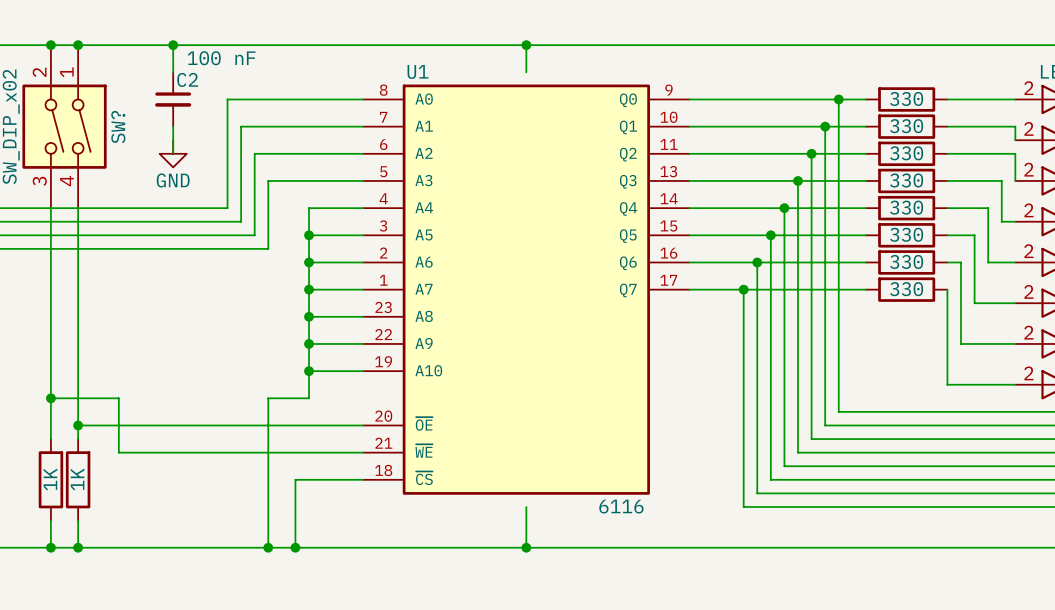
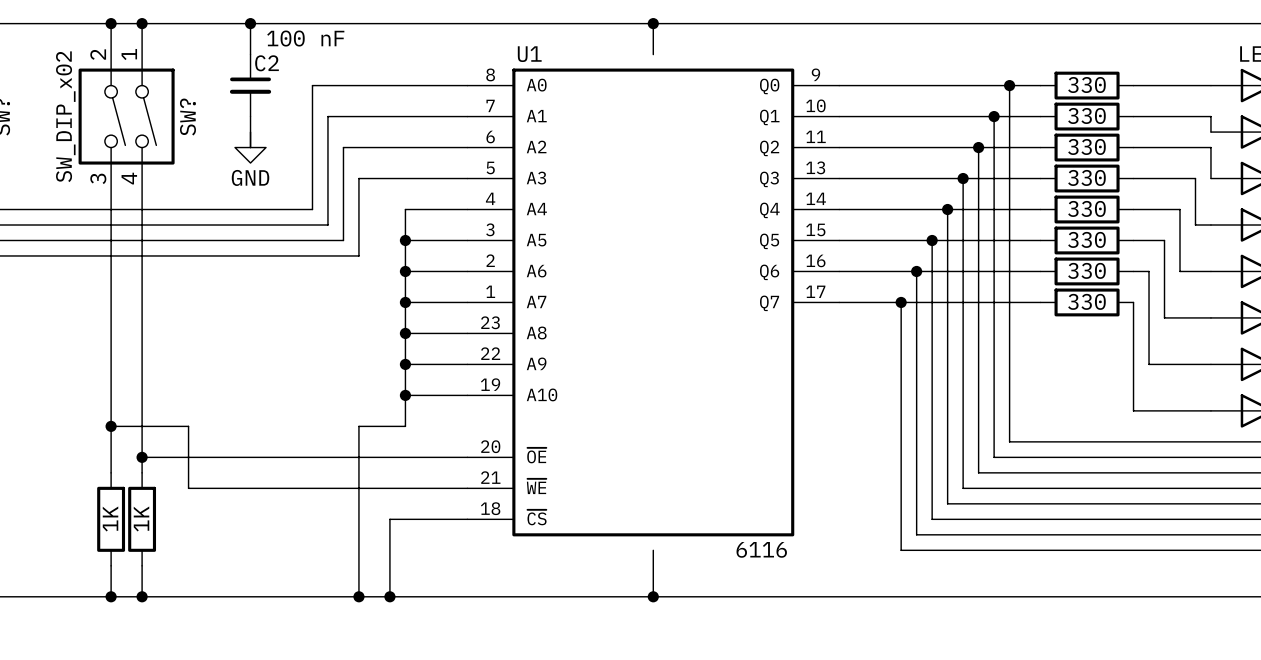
part pin number: 2 (1028, 88) -> none
part pin number: 2 (1028, 128) -> none
part pin number: 2 (1028, 169) -> none
part pin number: 2 (1028, 210) -> none
part pin number: 2 (1028, 251) -> none
part pin number: 2 (1028, 291) -> none
part pin number: 2 (1028, 332) -> none
part pin number: 2 (1028, 373) -> none

